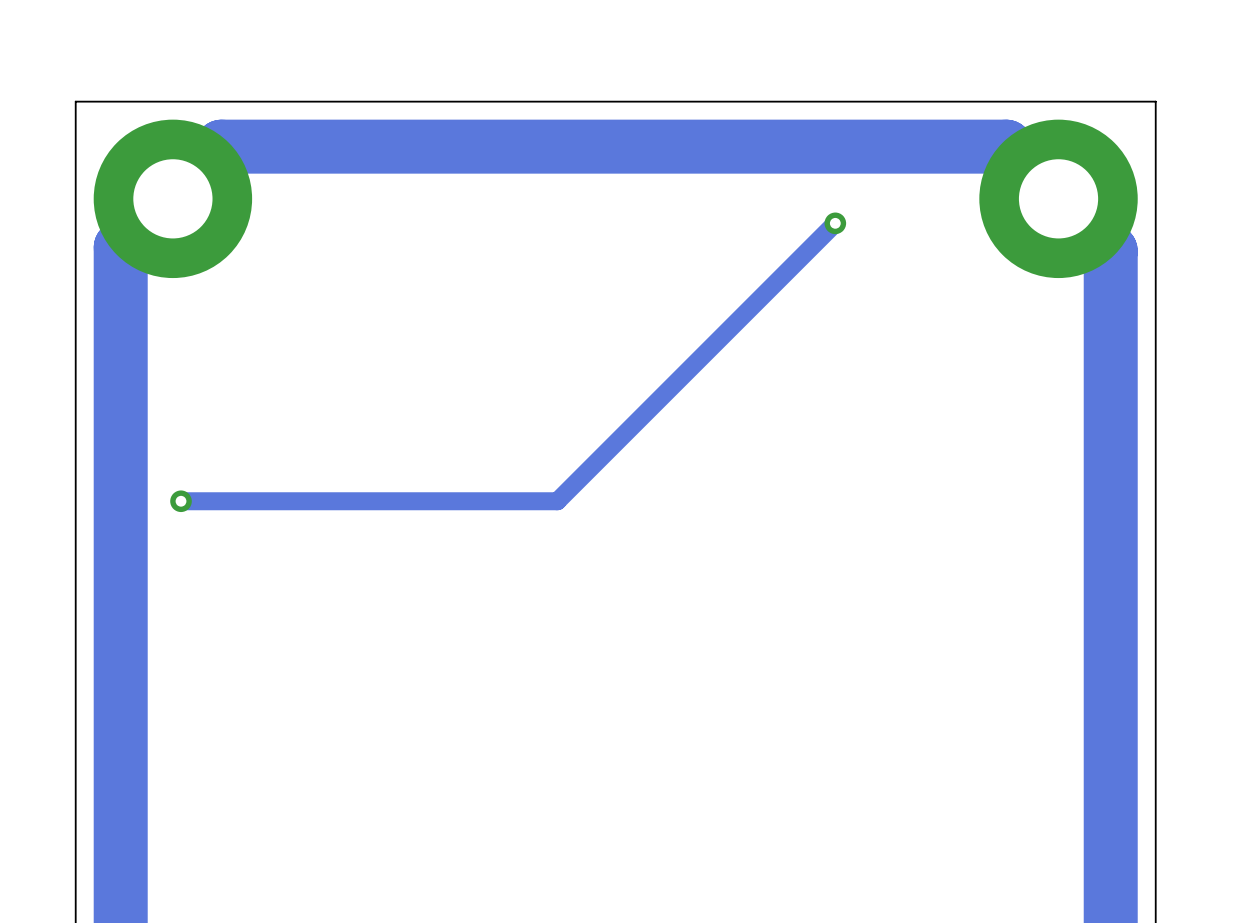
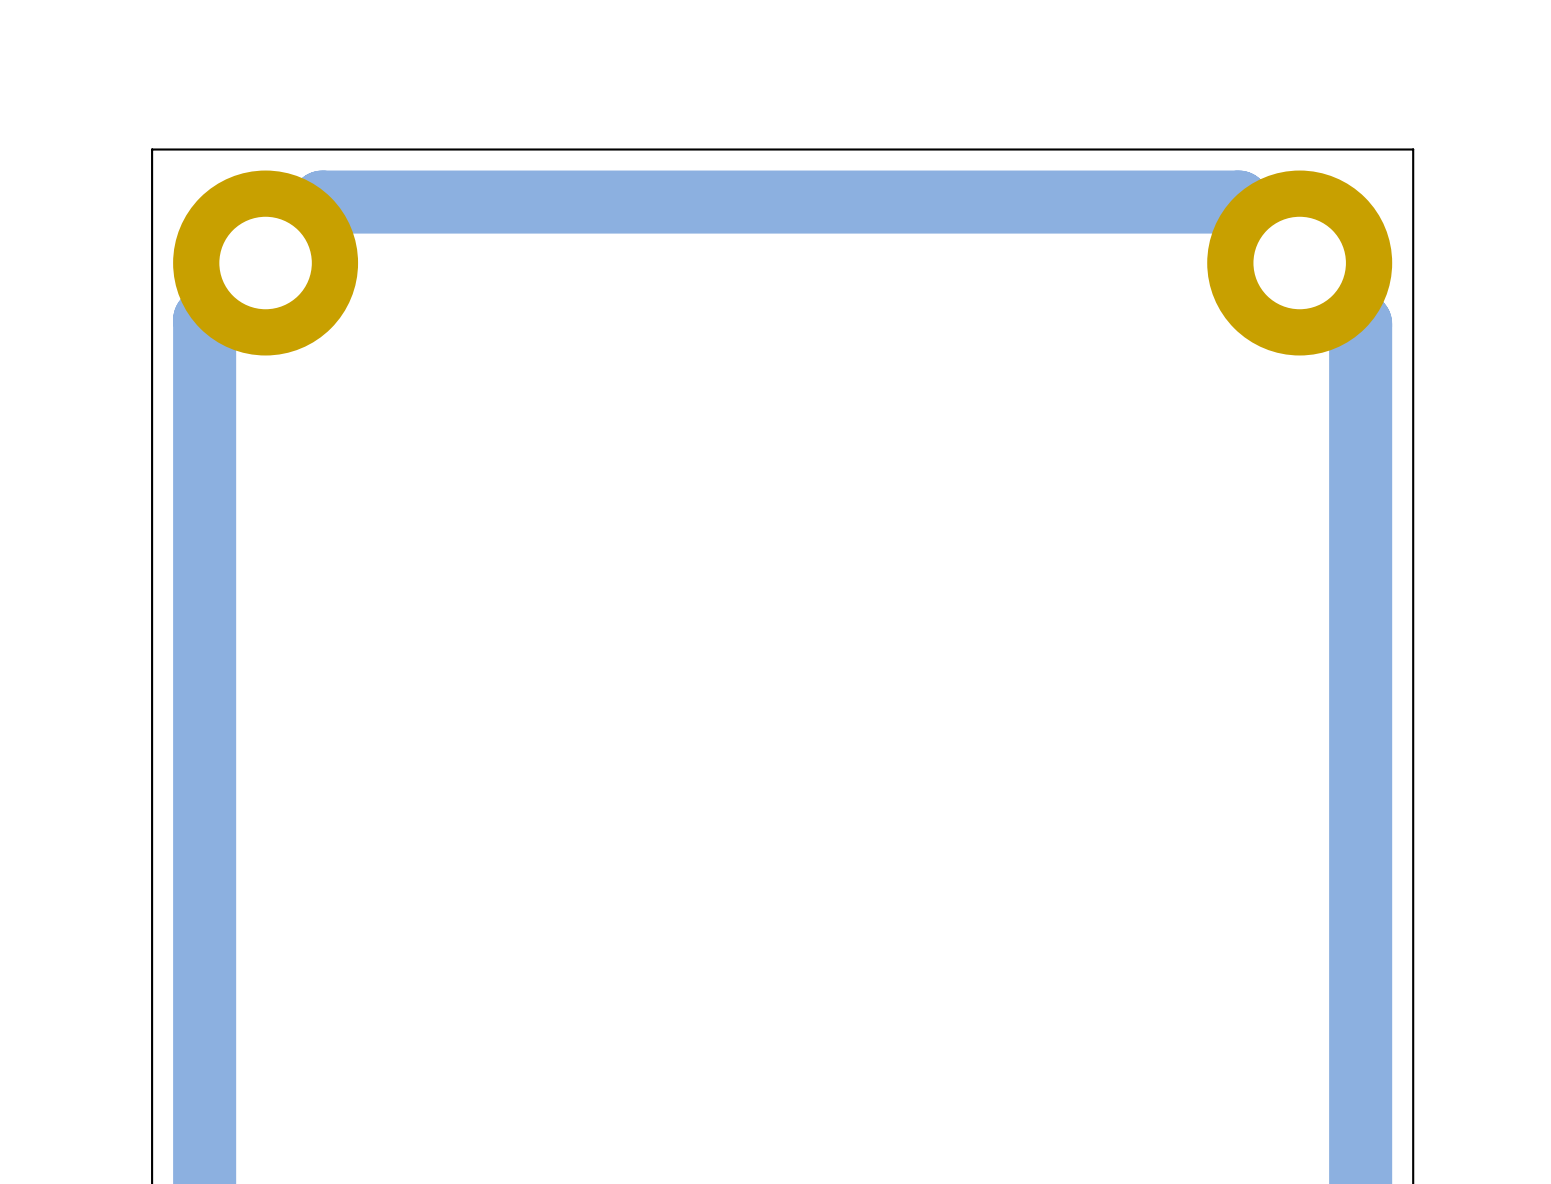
track: (835, 223) (557, 501) (181, 501) -> none
via: (835, 223) -> none
via: (181, 501) -> none

